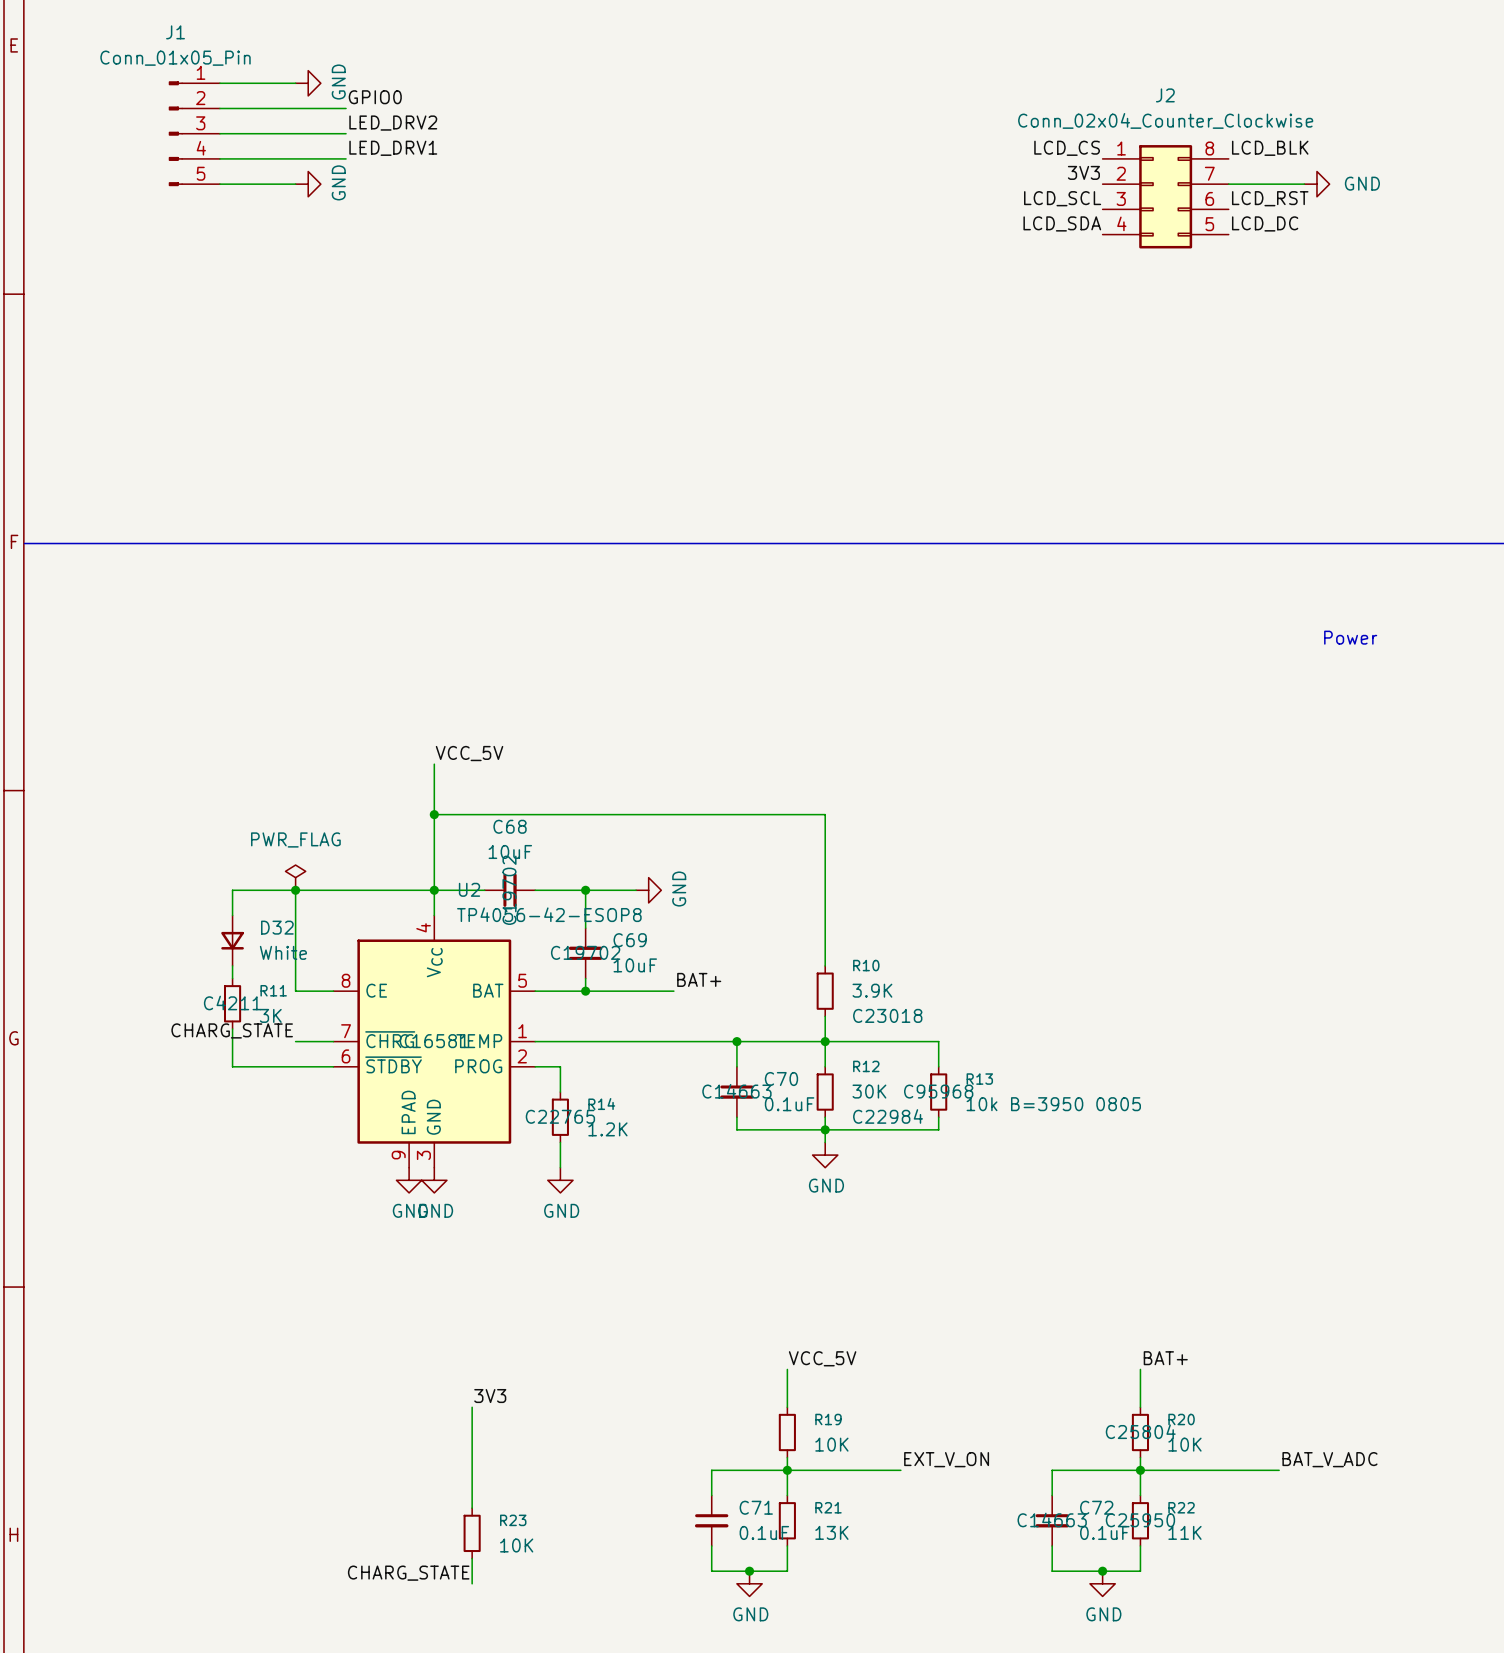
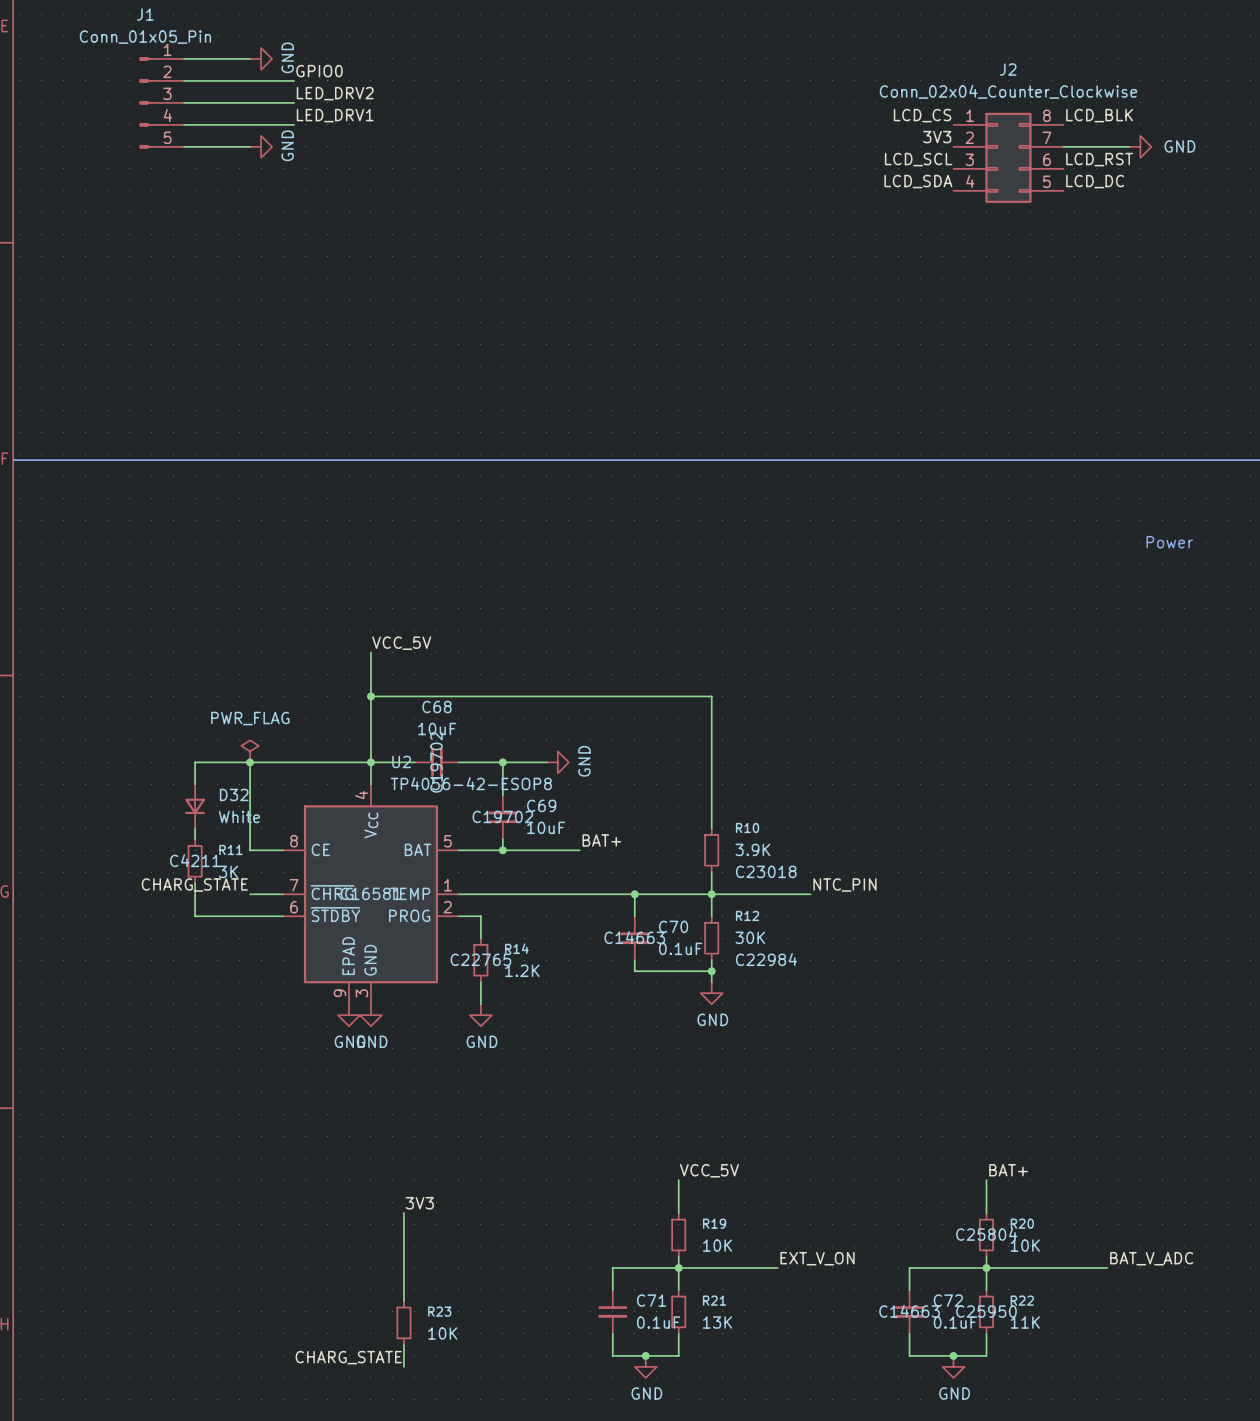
label: none -> NTC_PIN (844, 884)
wire: (938, 1041) (938, 1066) -> none
R13: 10k B=3950 0805 (938, 1092) -> none
wire: (938, 1117) (938, 1129) (825, 1129) -> none

